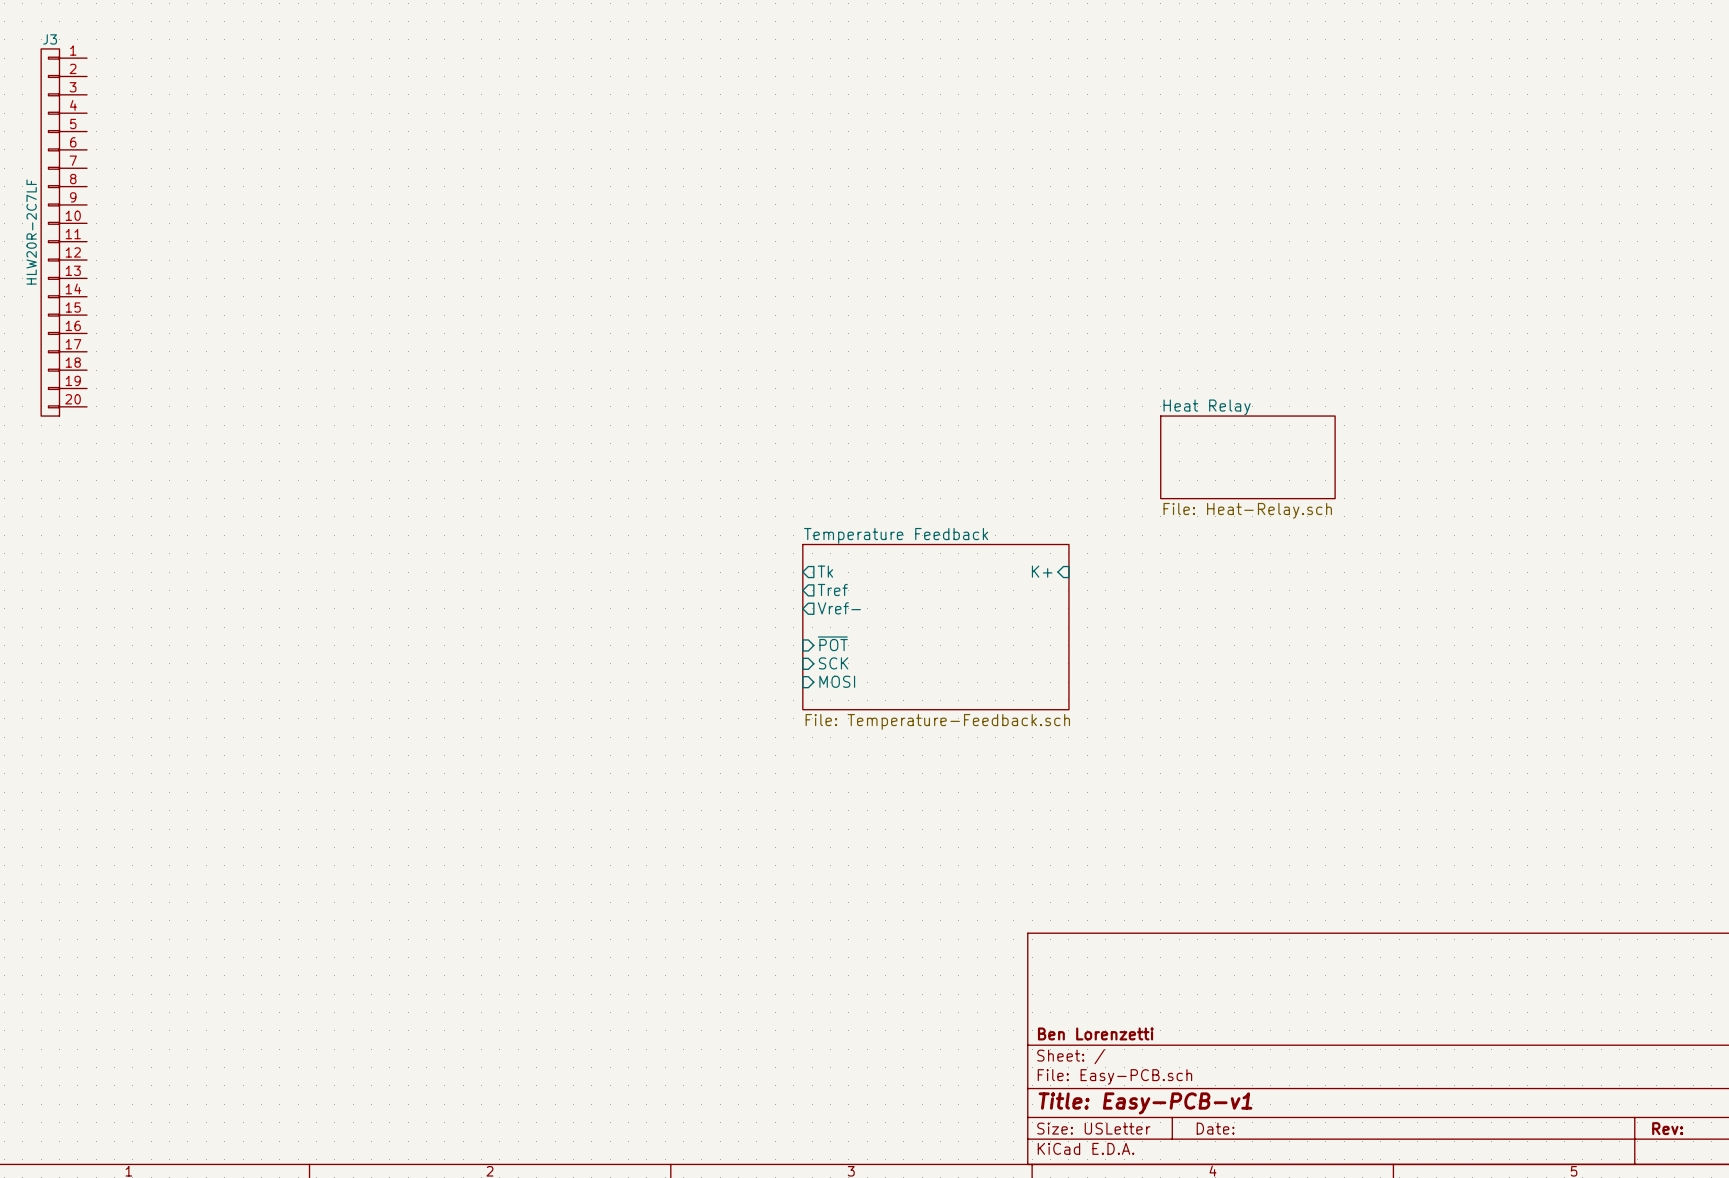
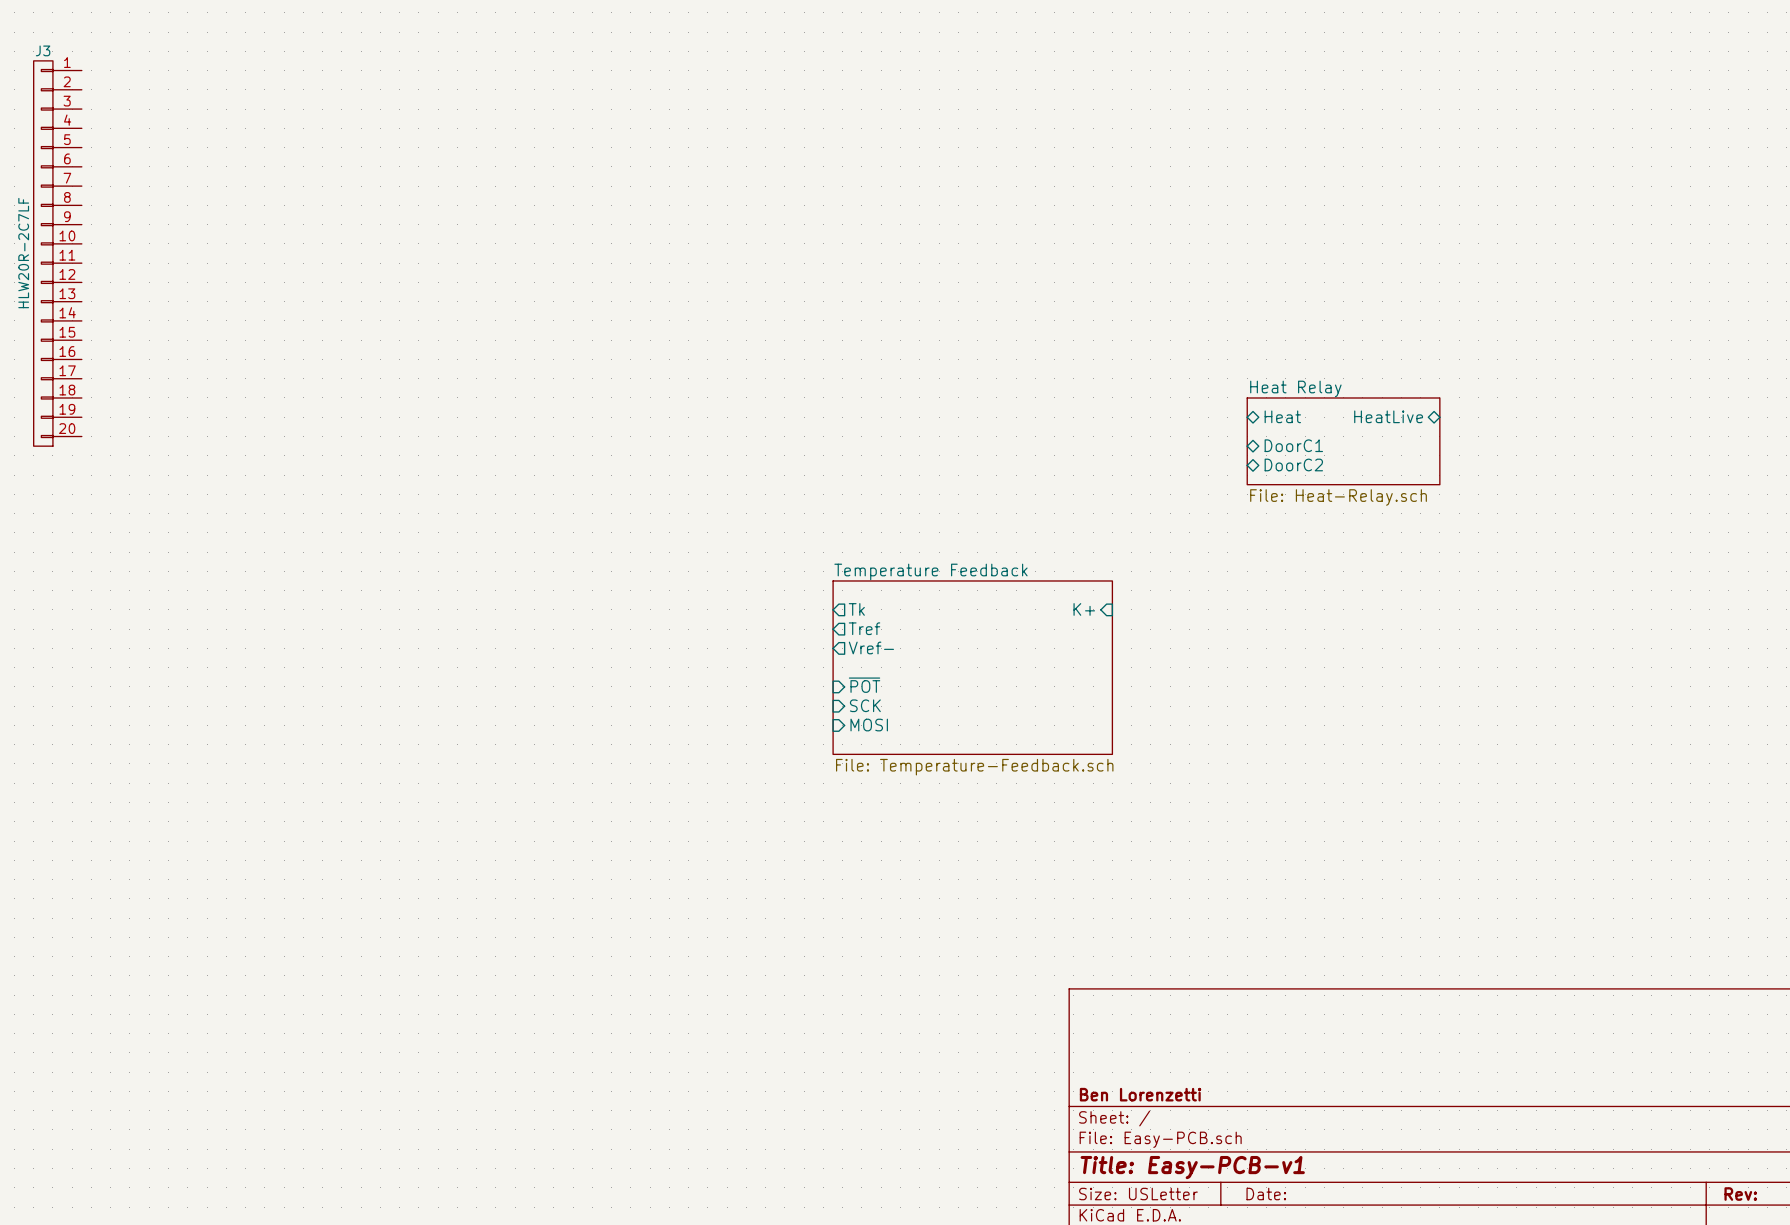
sheet pin: none -> Heat (1282, 416)
sheet pin: none -> HeatLive (1388, 416)
sheet Heat Relay: none -> File: Heat-Relay.sch (1343, 441)
sheet pin: none -> DoorC1 (1293, 445)
sheet pin: none -> DoorC2 (1293, 464)
sheet Heat Relay: File: Heat-Relay.sch (1247, 457) -> none

